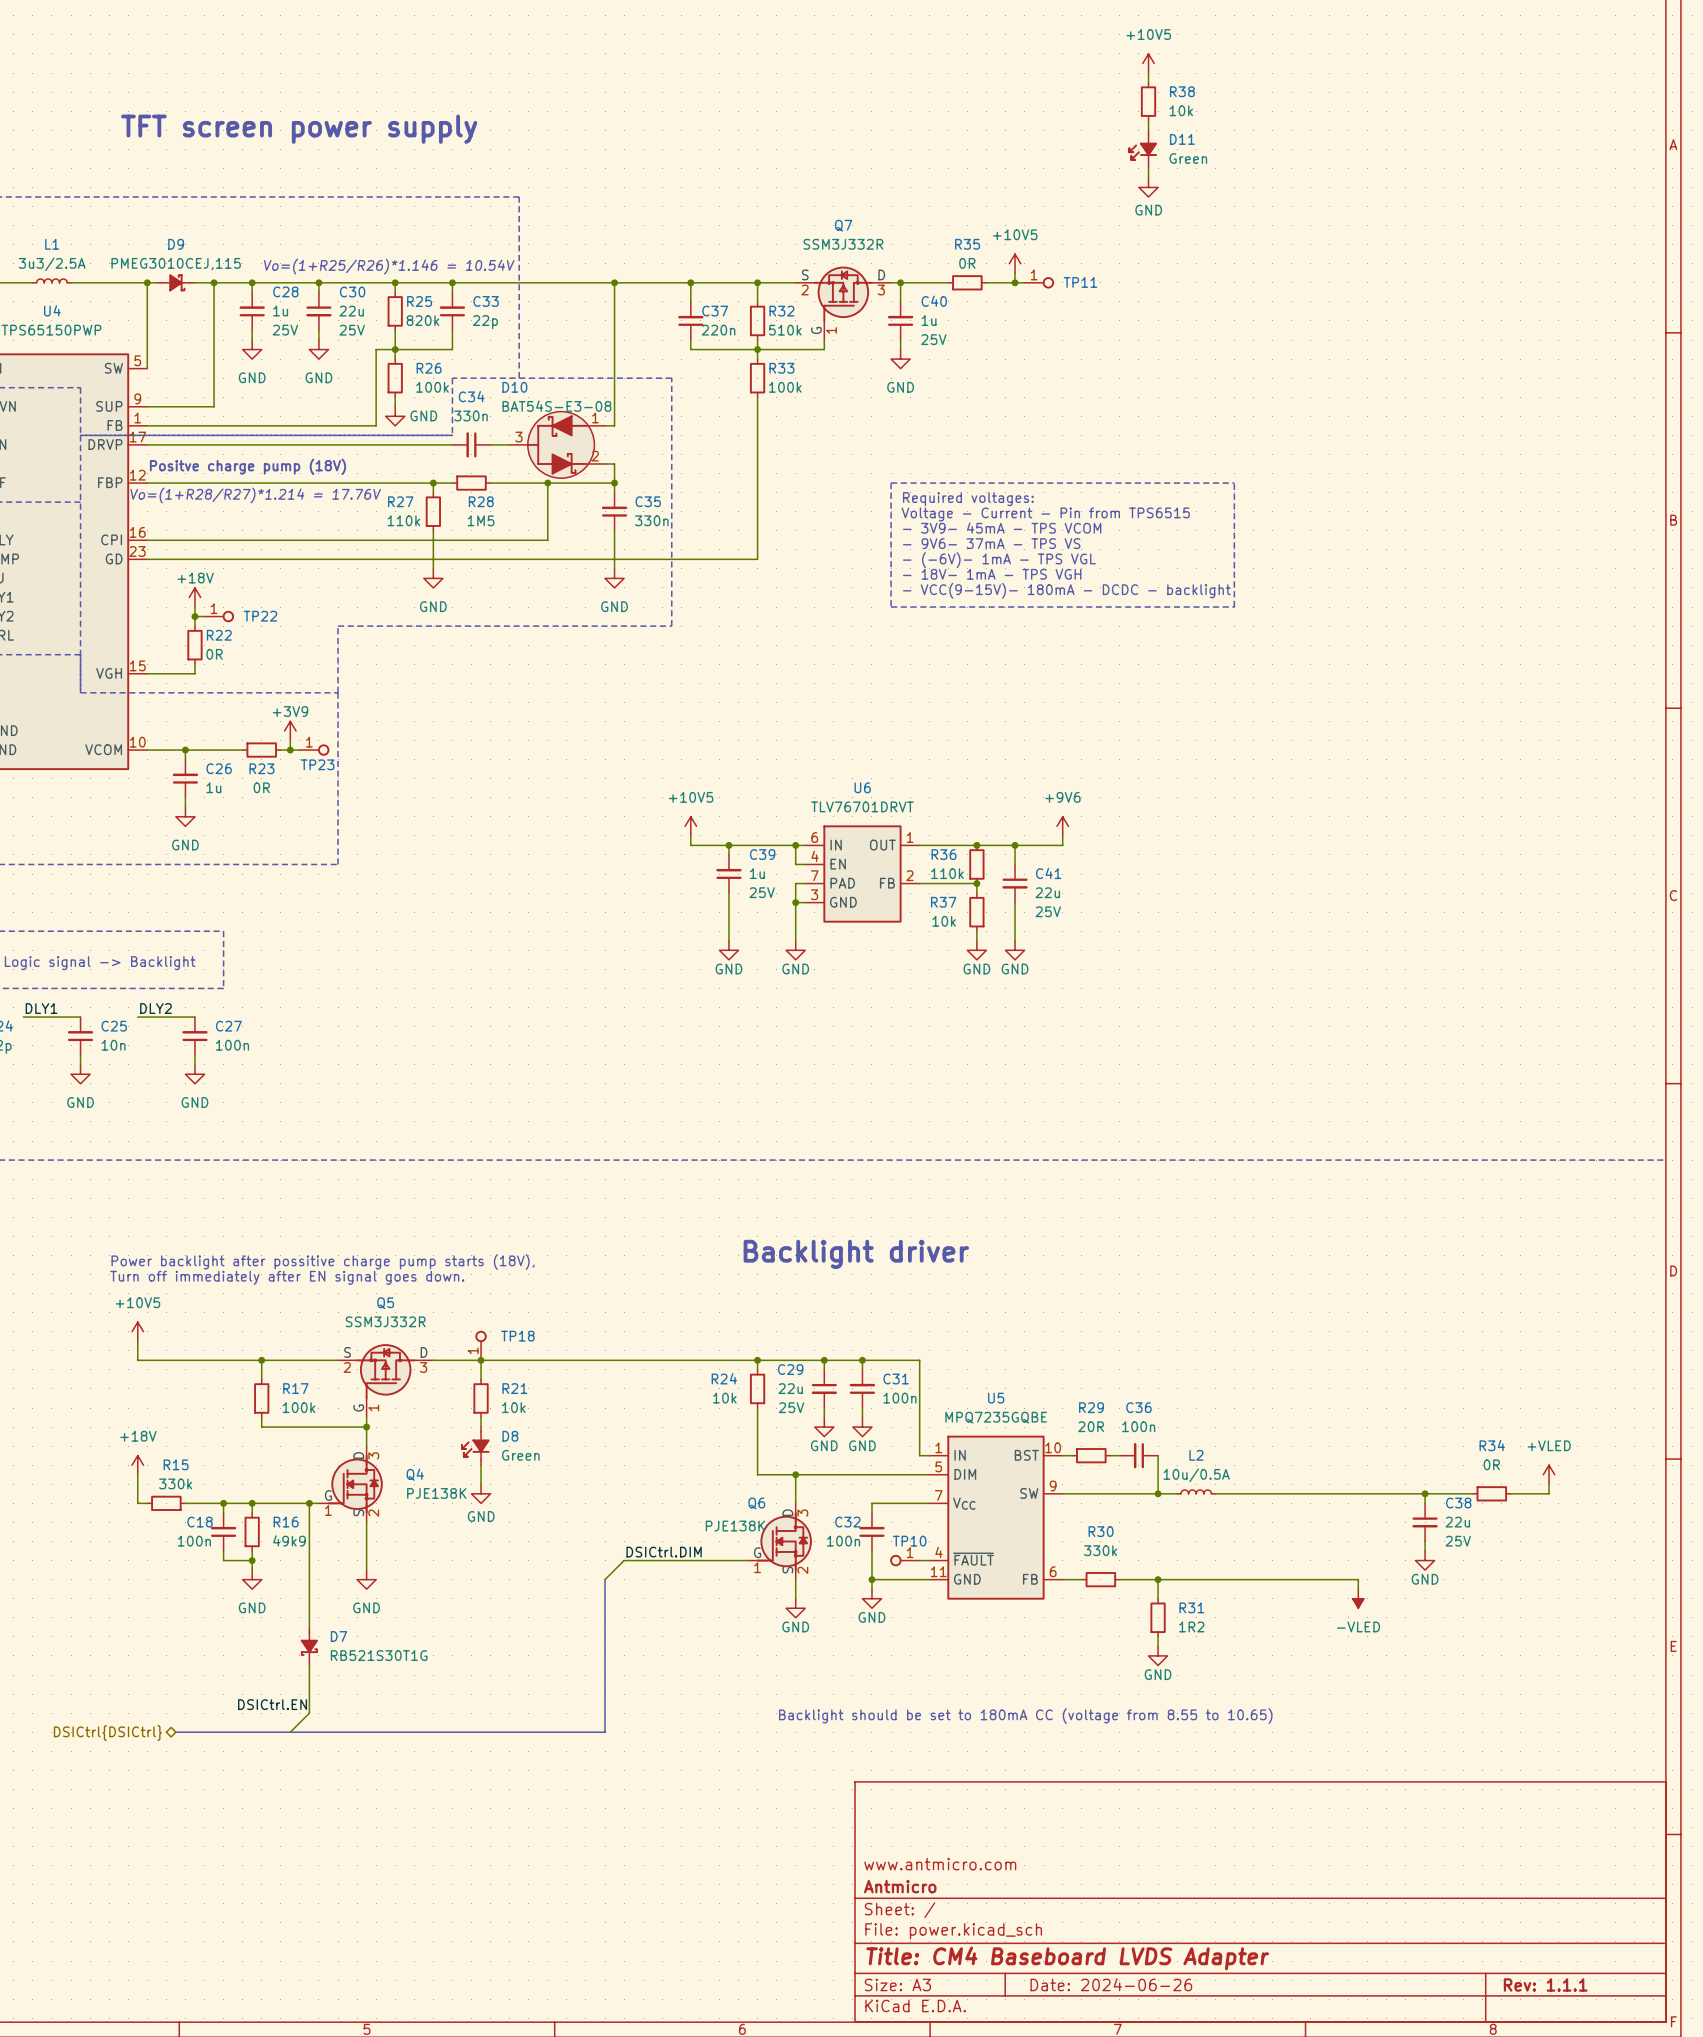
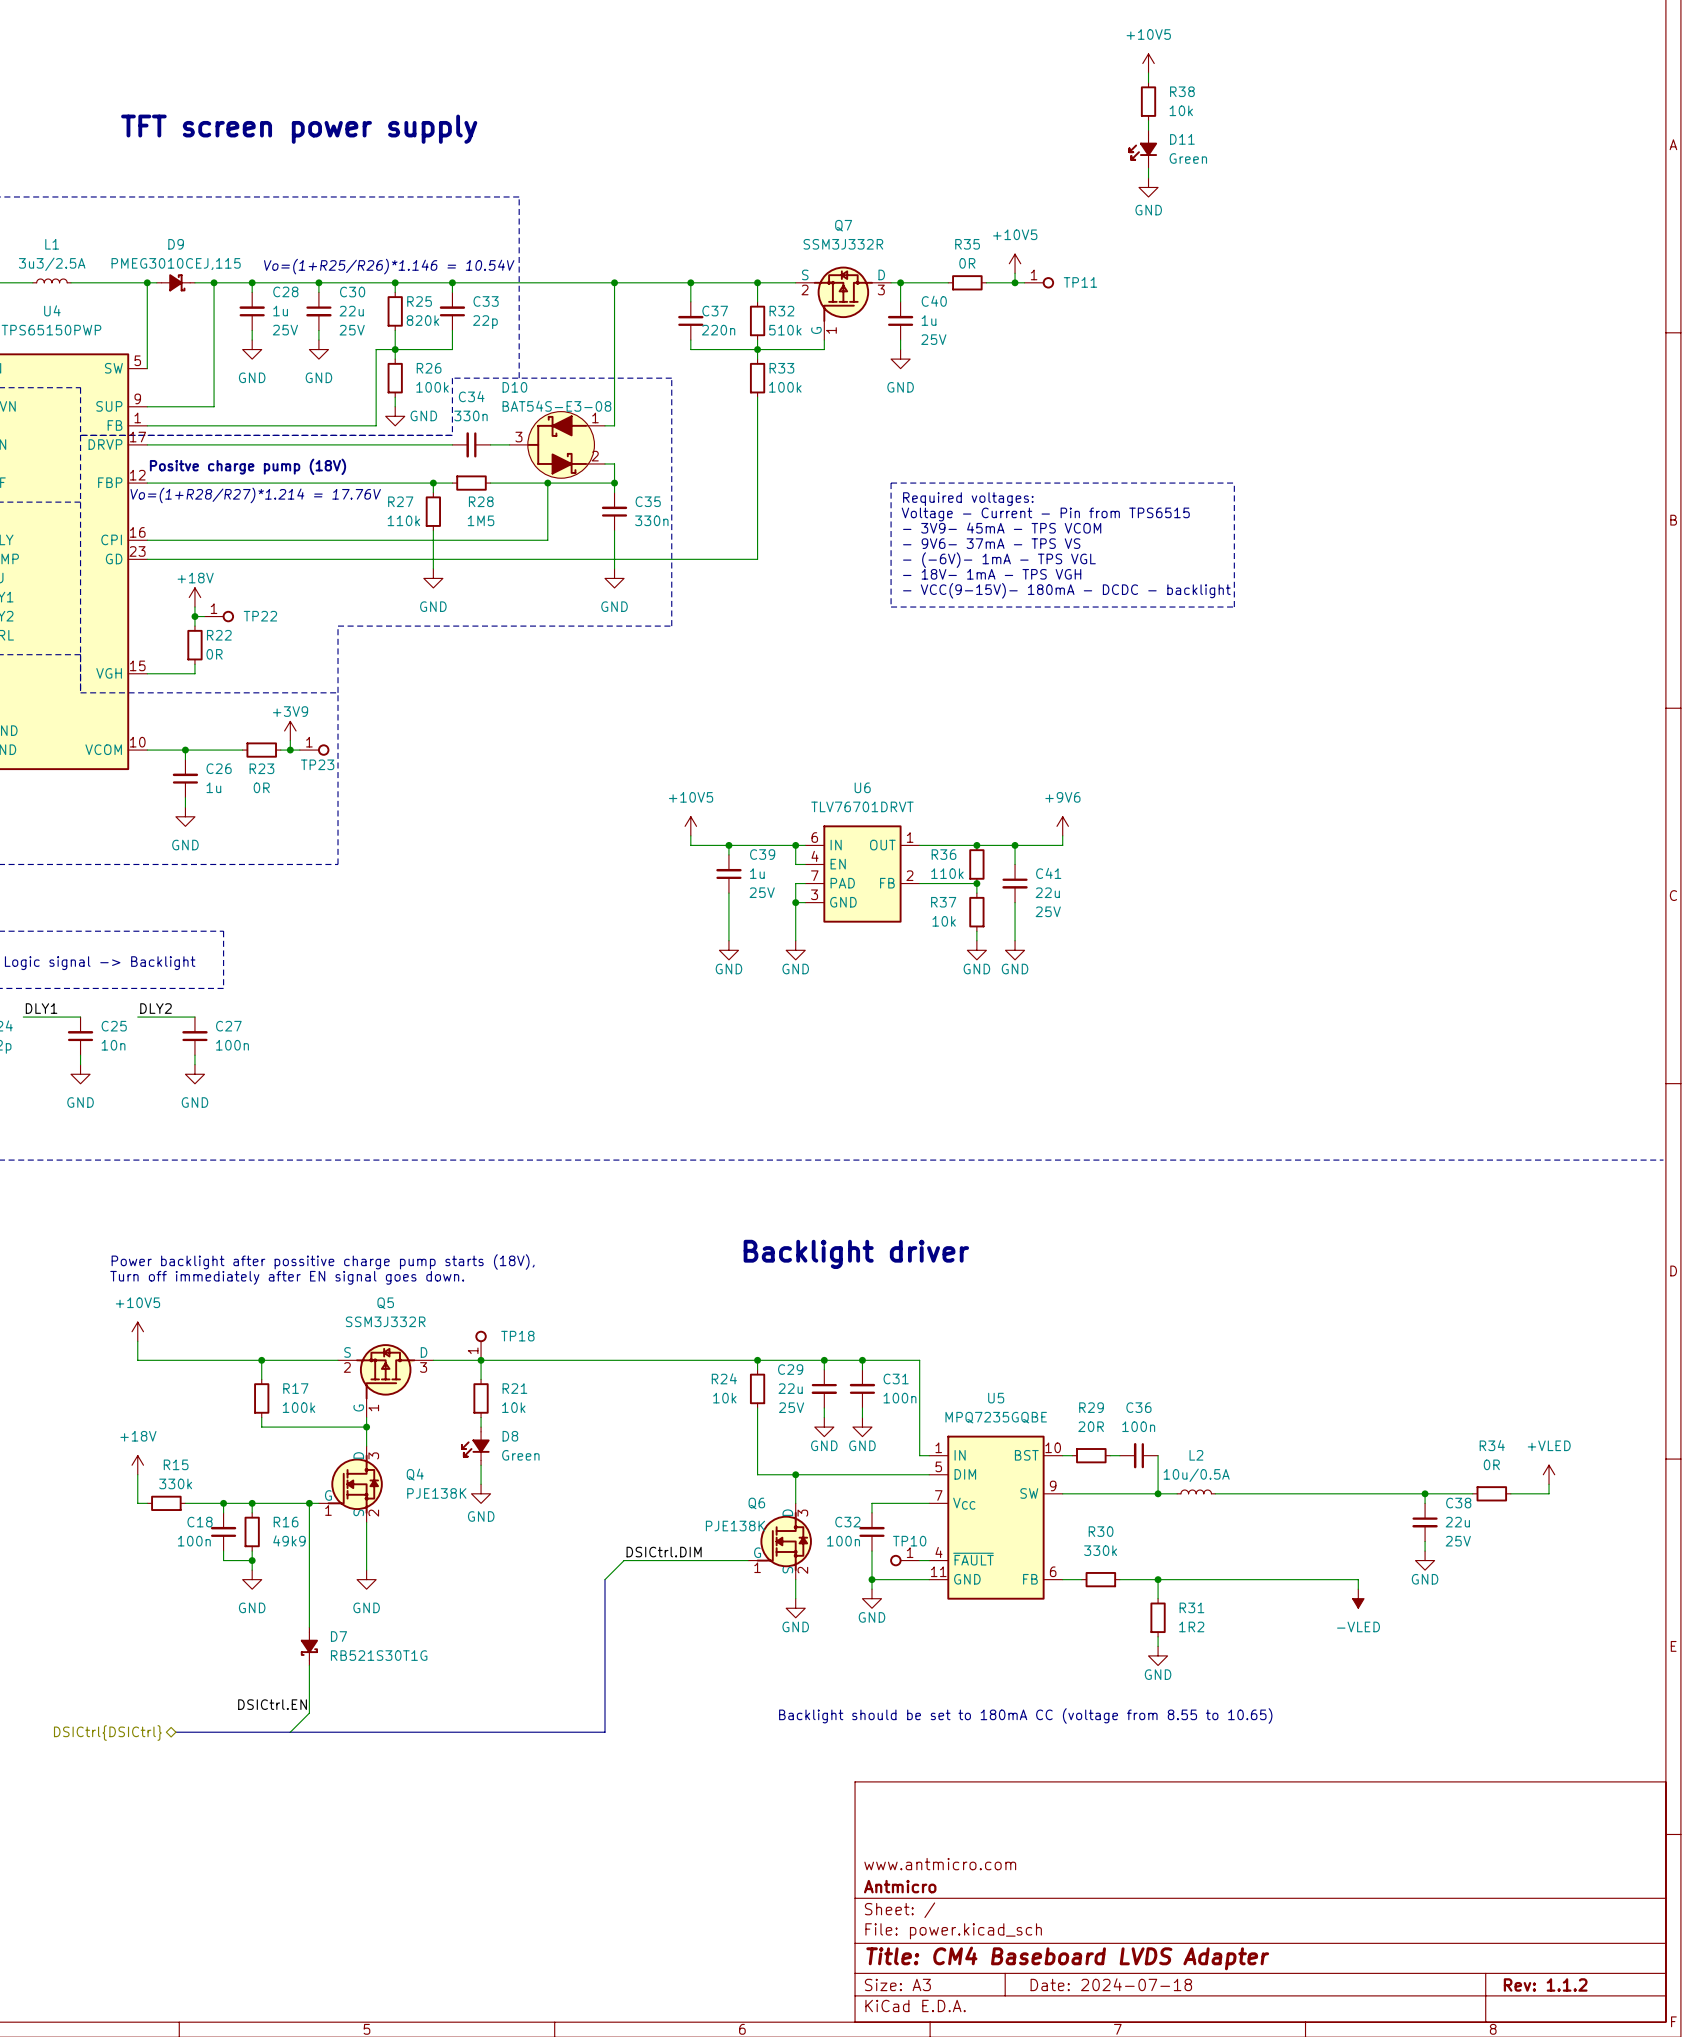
title block: Date: 2024-06-26 (1111, 1984) -> Date: 2024-07-18 (1111, 1984)
title block: Rev: 1.1.1 (1545, 1984) -> Rev: 1.1.2 (1545, 1984)

